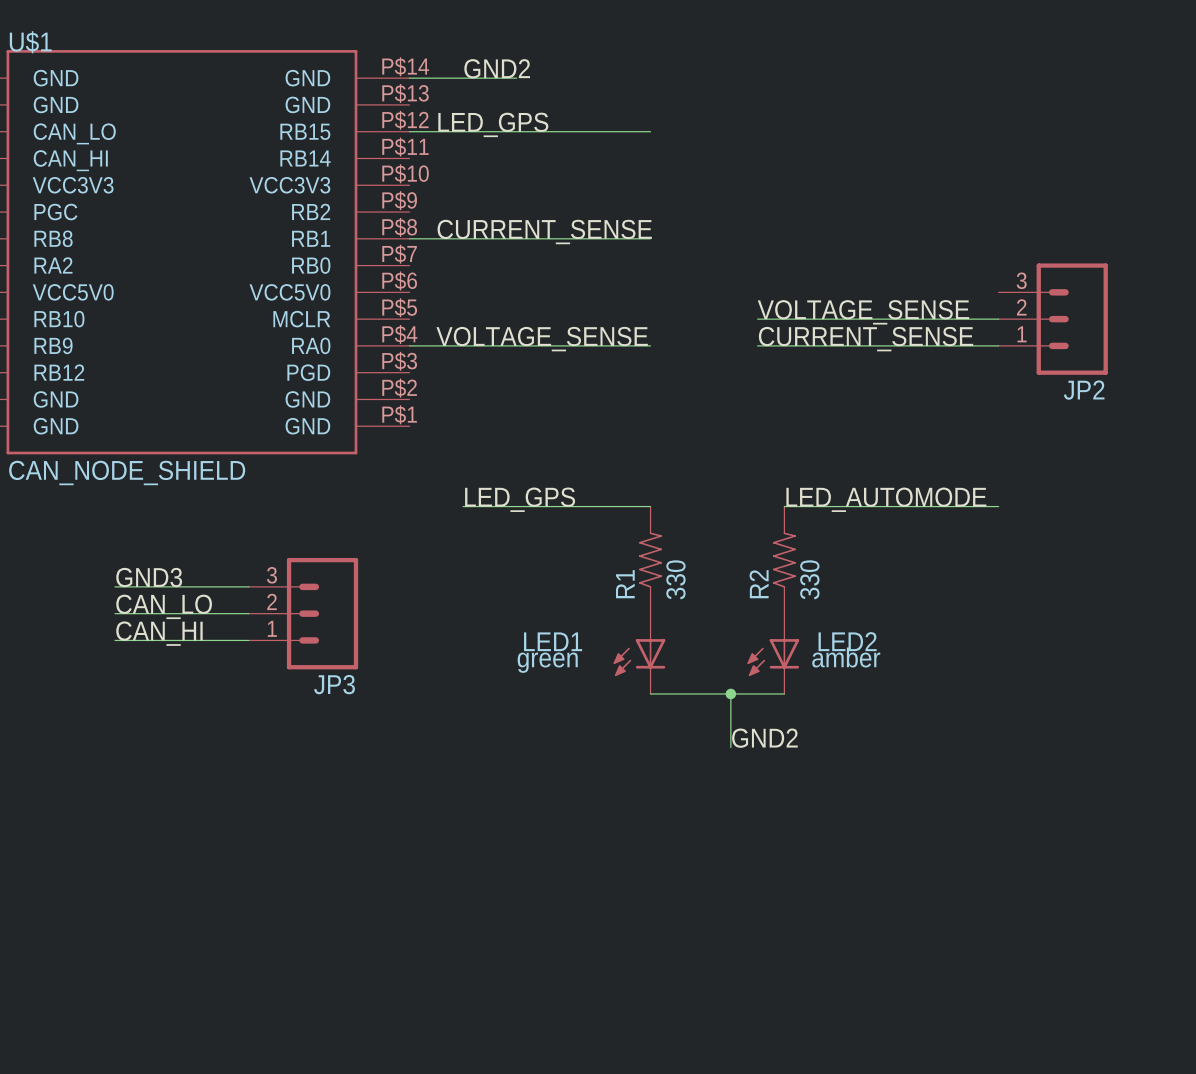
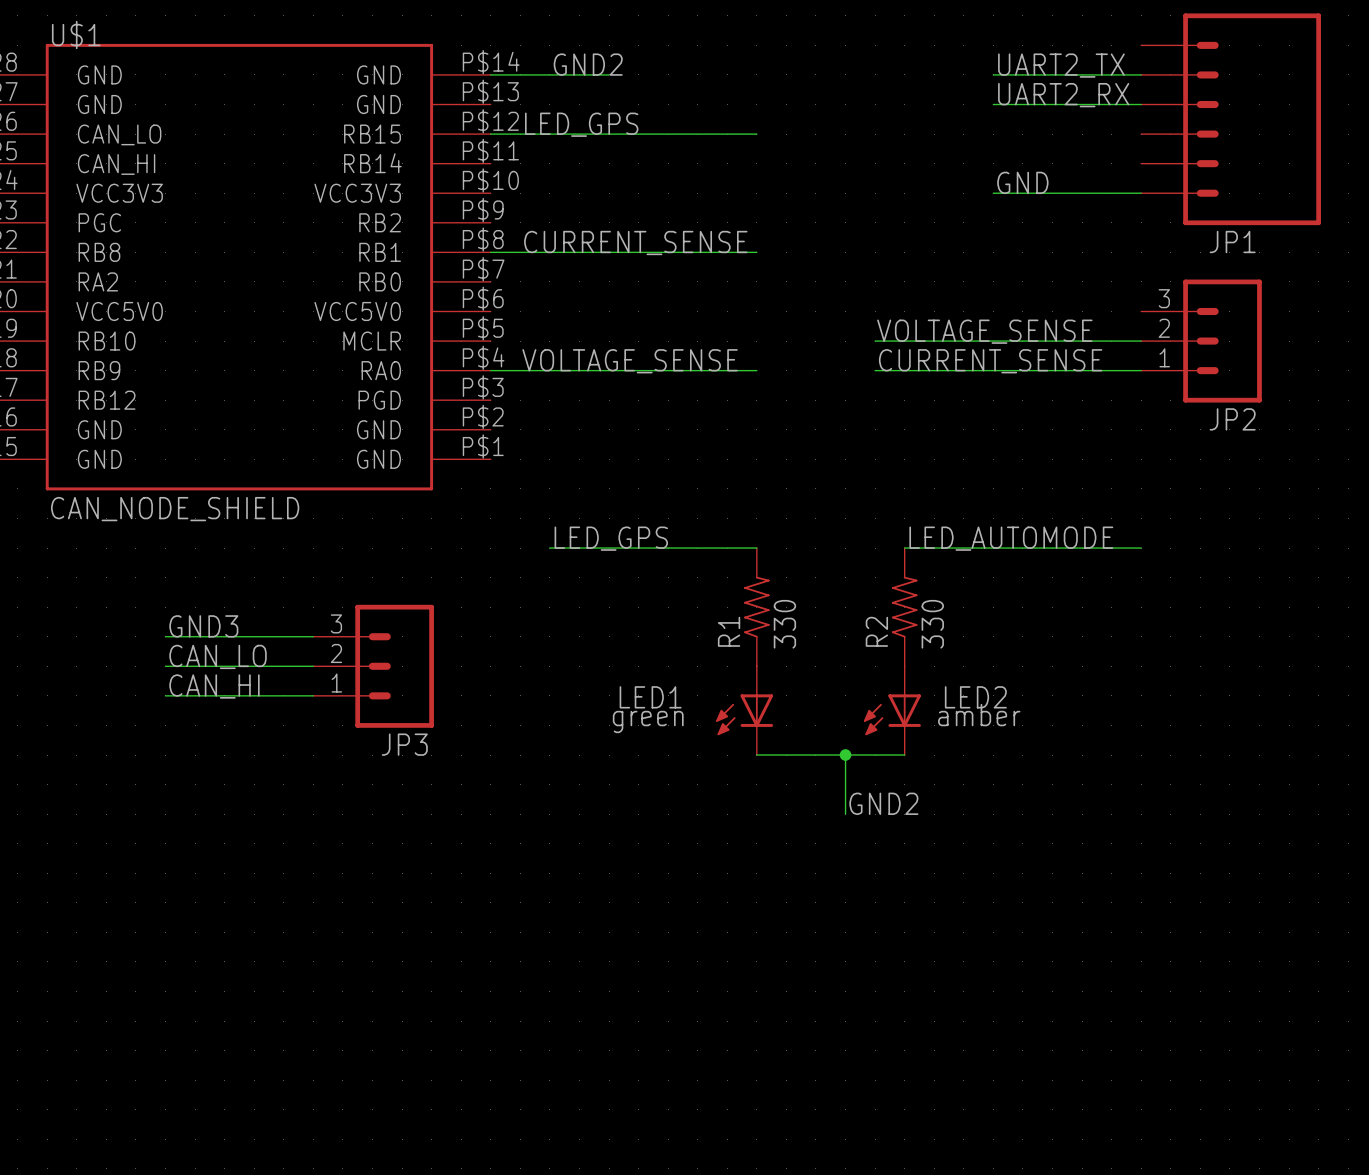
label: none -> UART2_TX (1061, 65)
wire: none -> (993, 74) (1141, 74)
label: none -> UART2_RX (1063, 95)
wire: none -> (993, 104) (1141, 104)
JP1: none -> (1231, 119)
label: none -> GND (1022, 182)
wire: none -> (993, 193) (1141, 193)

